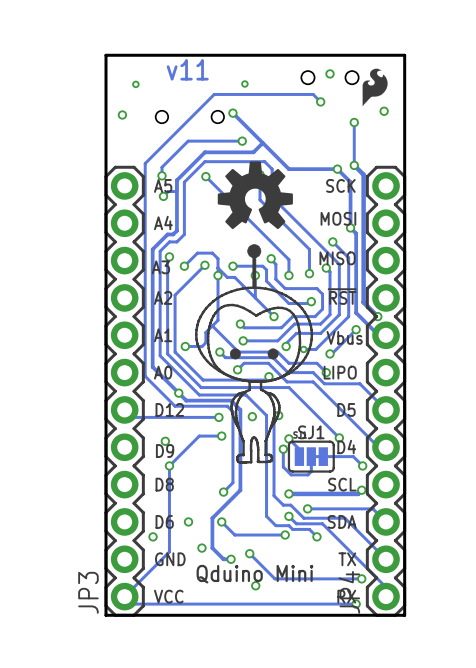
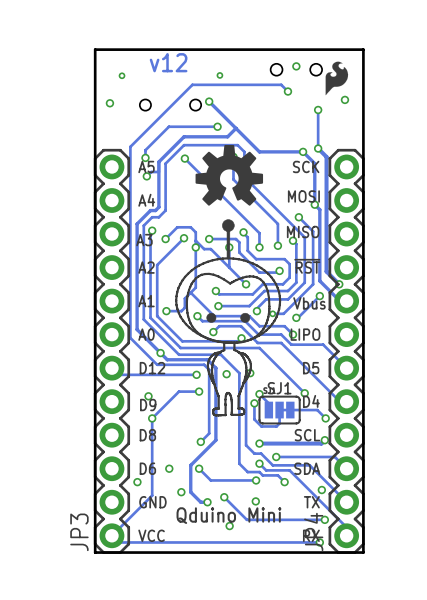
text: v11 (187, 69) -> v12 (168, 62)
via: none -> (321, 490)
via: none -> (255, 501)

